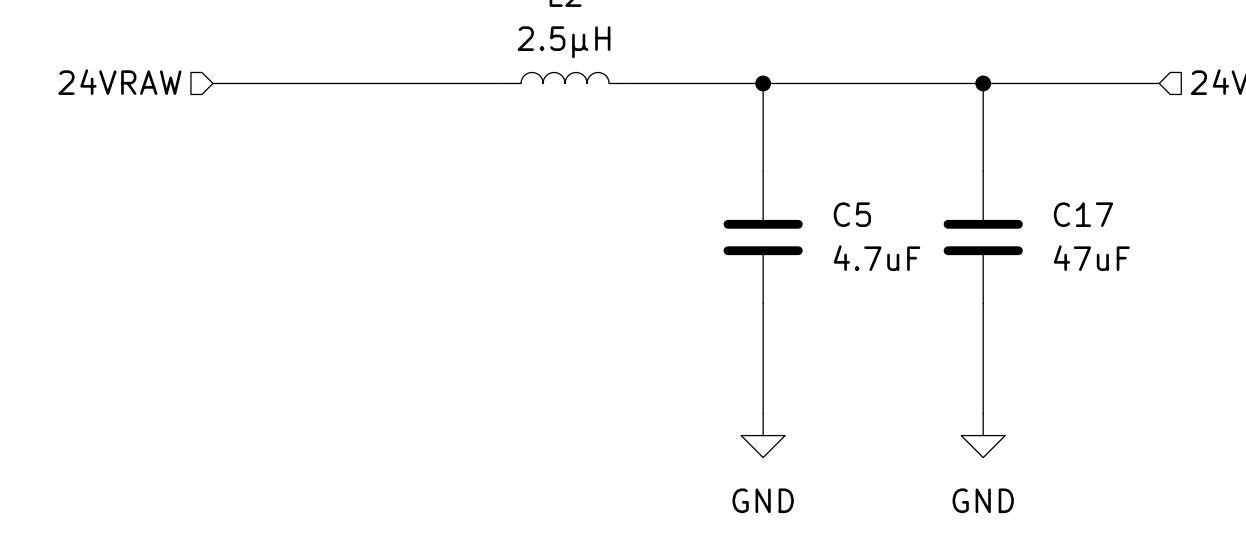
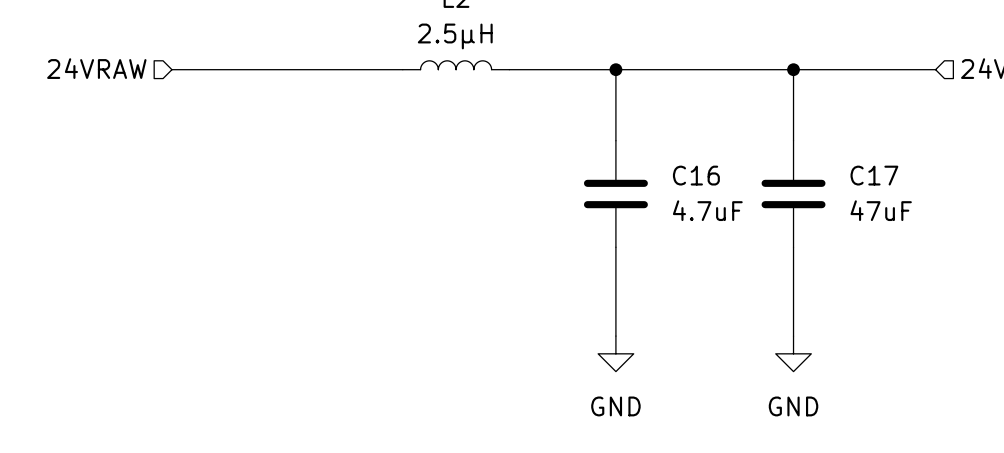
C5 name: C5 (852, 214) -> C16 (696, 175)

